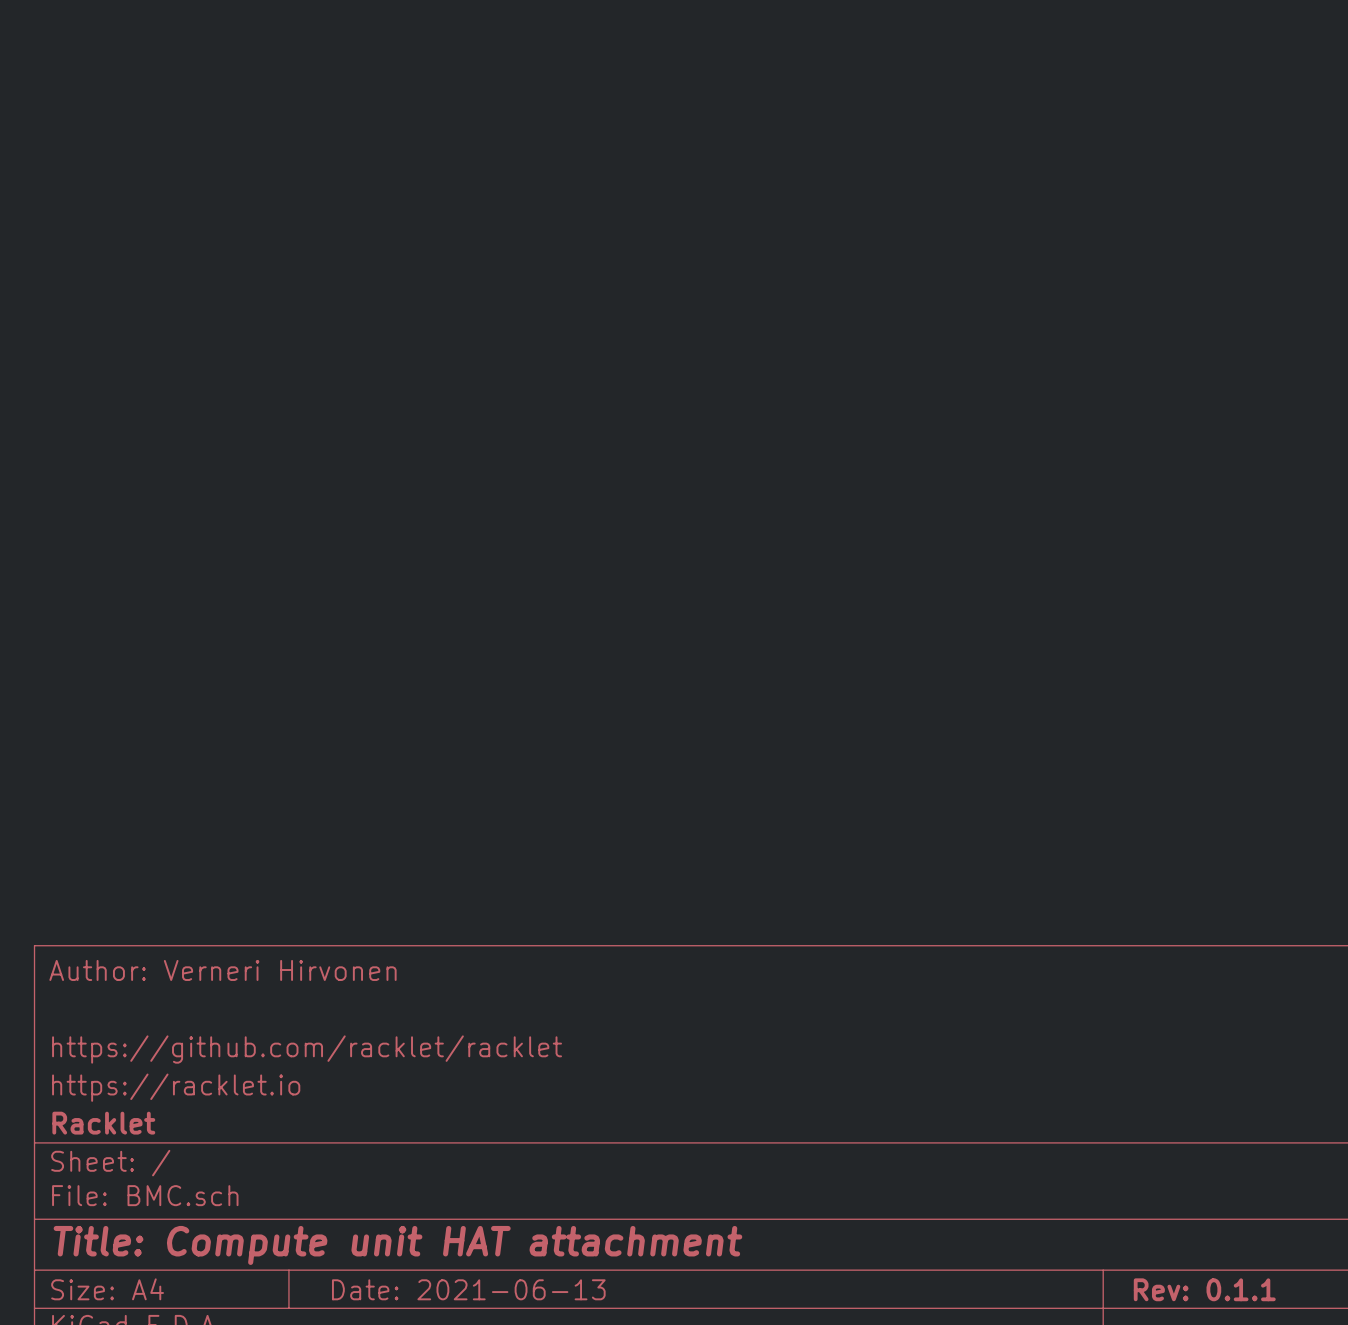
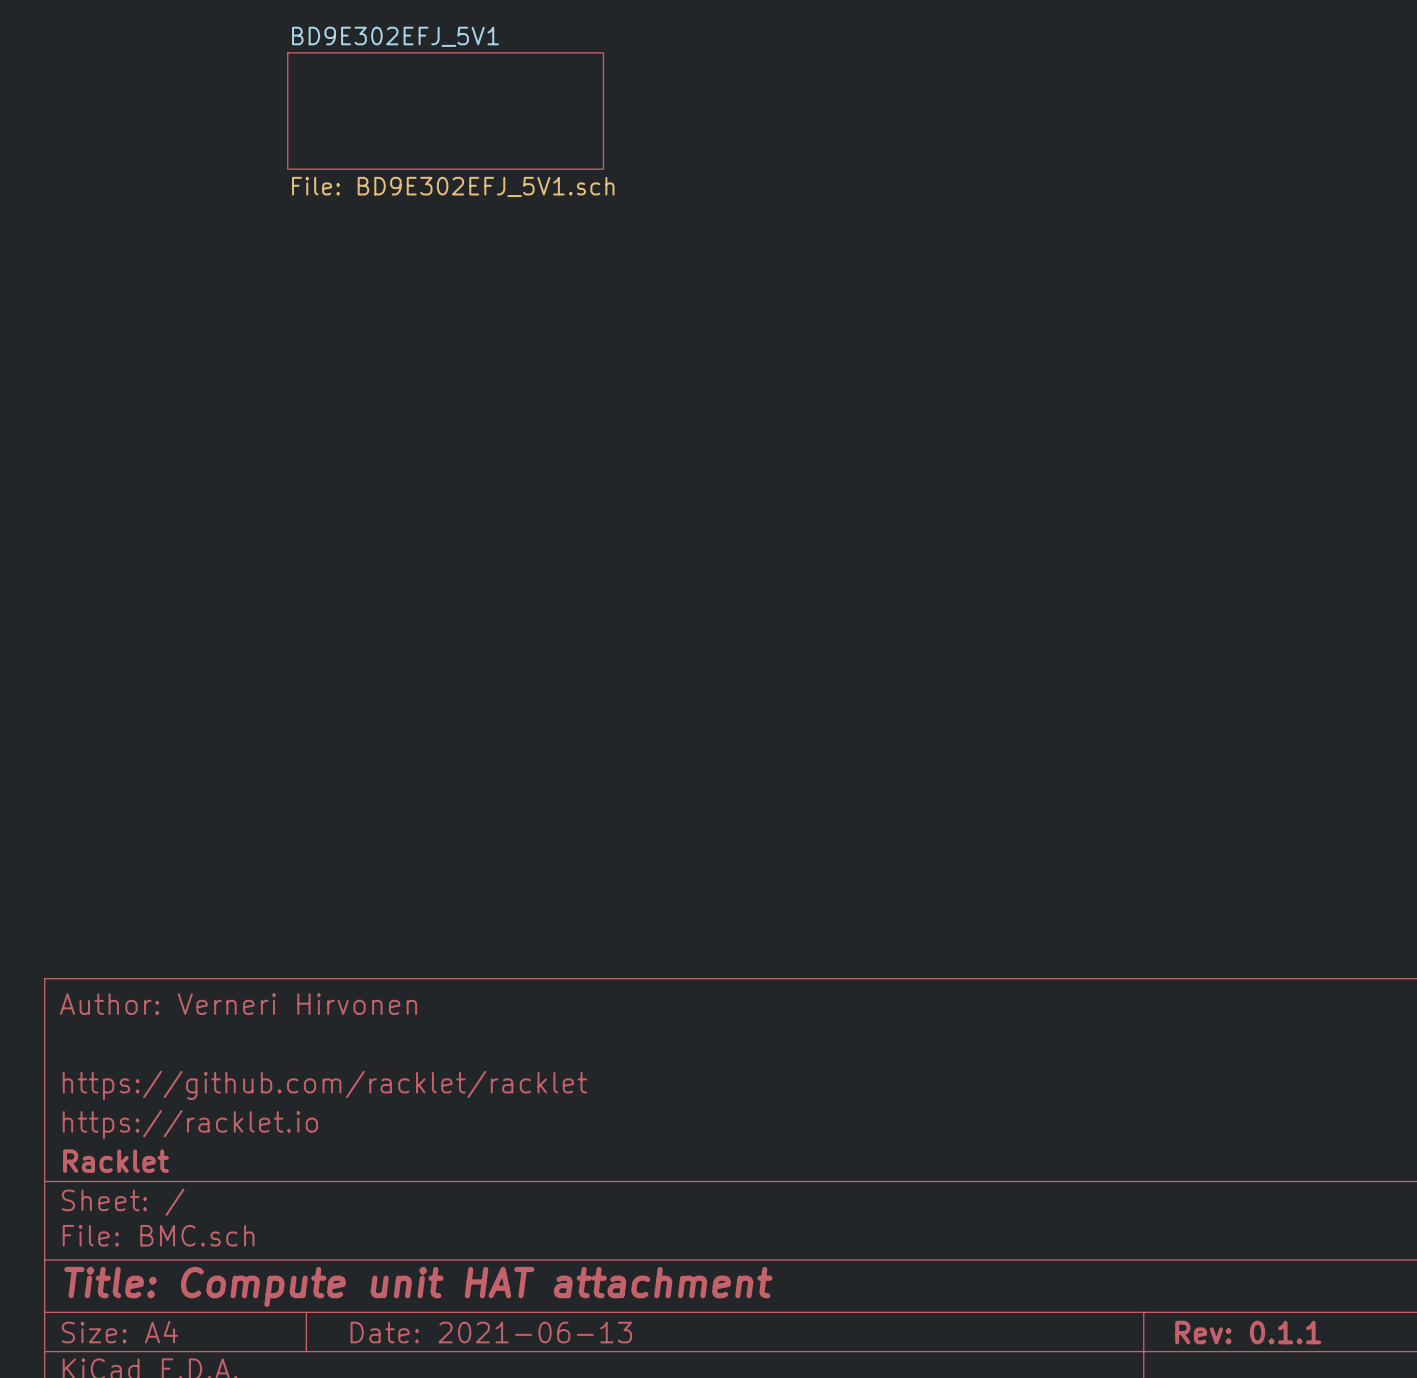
sheet BD9E302EFJ_5V1: none -> File: BD9E302EFJ_5V1.sch (445, 111)

